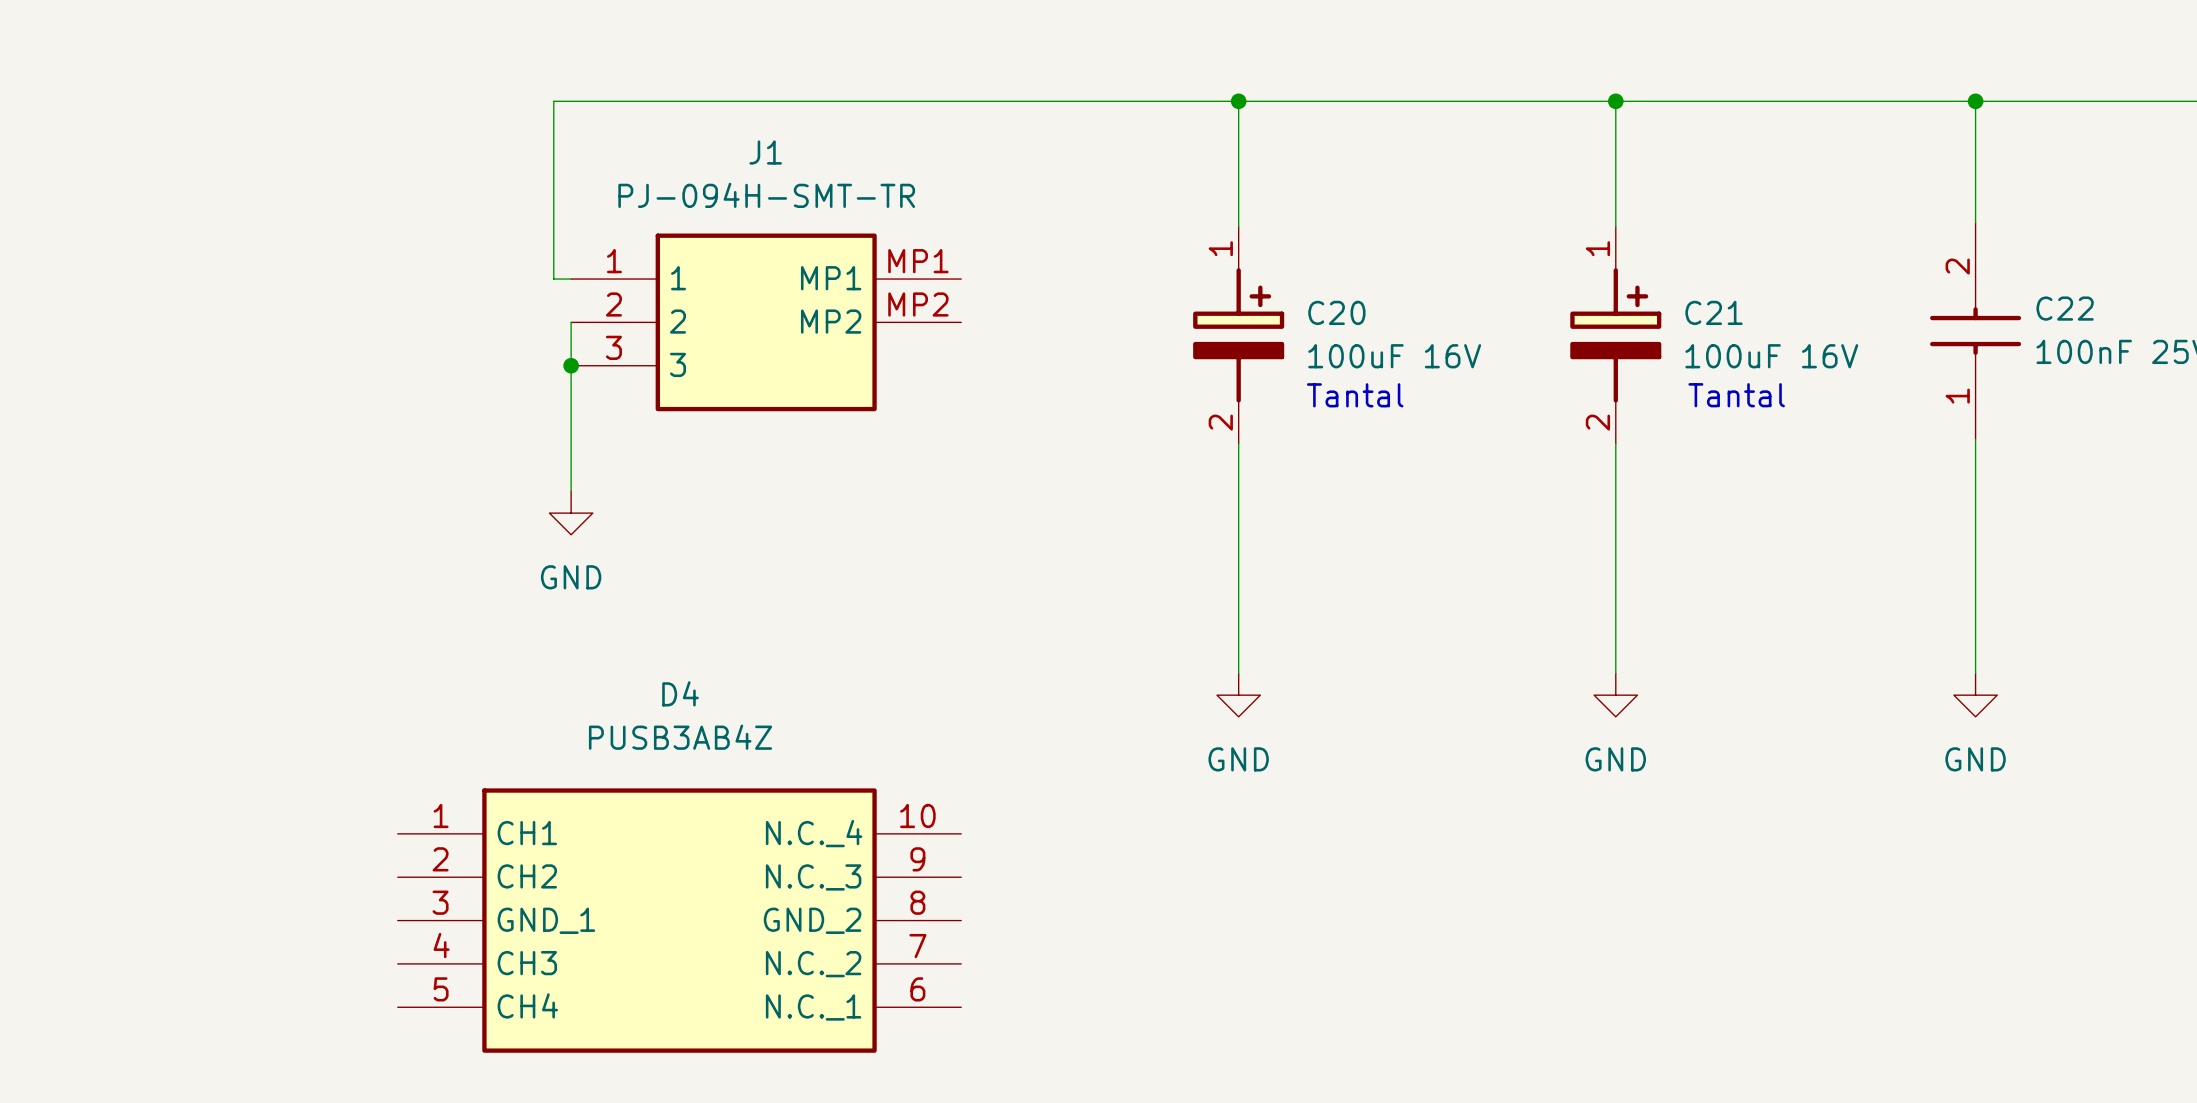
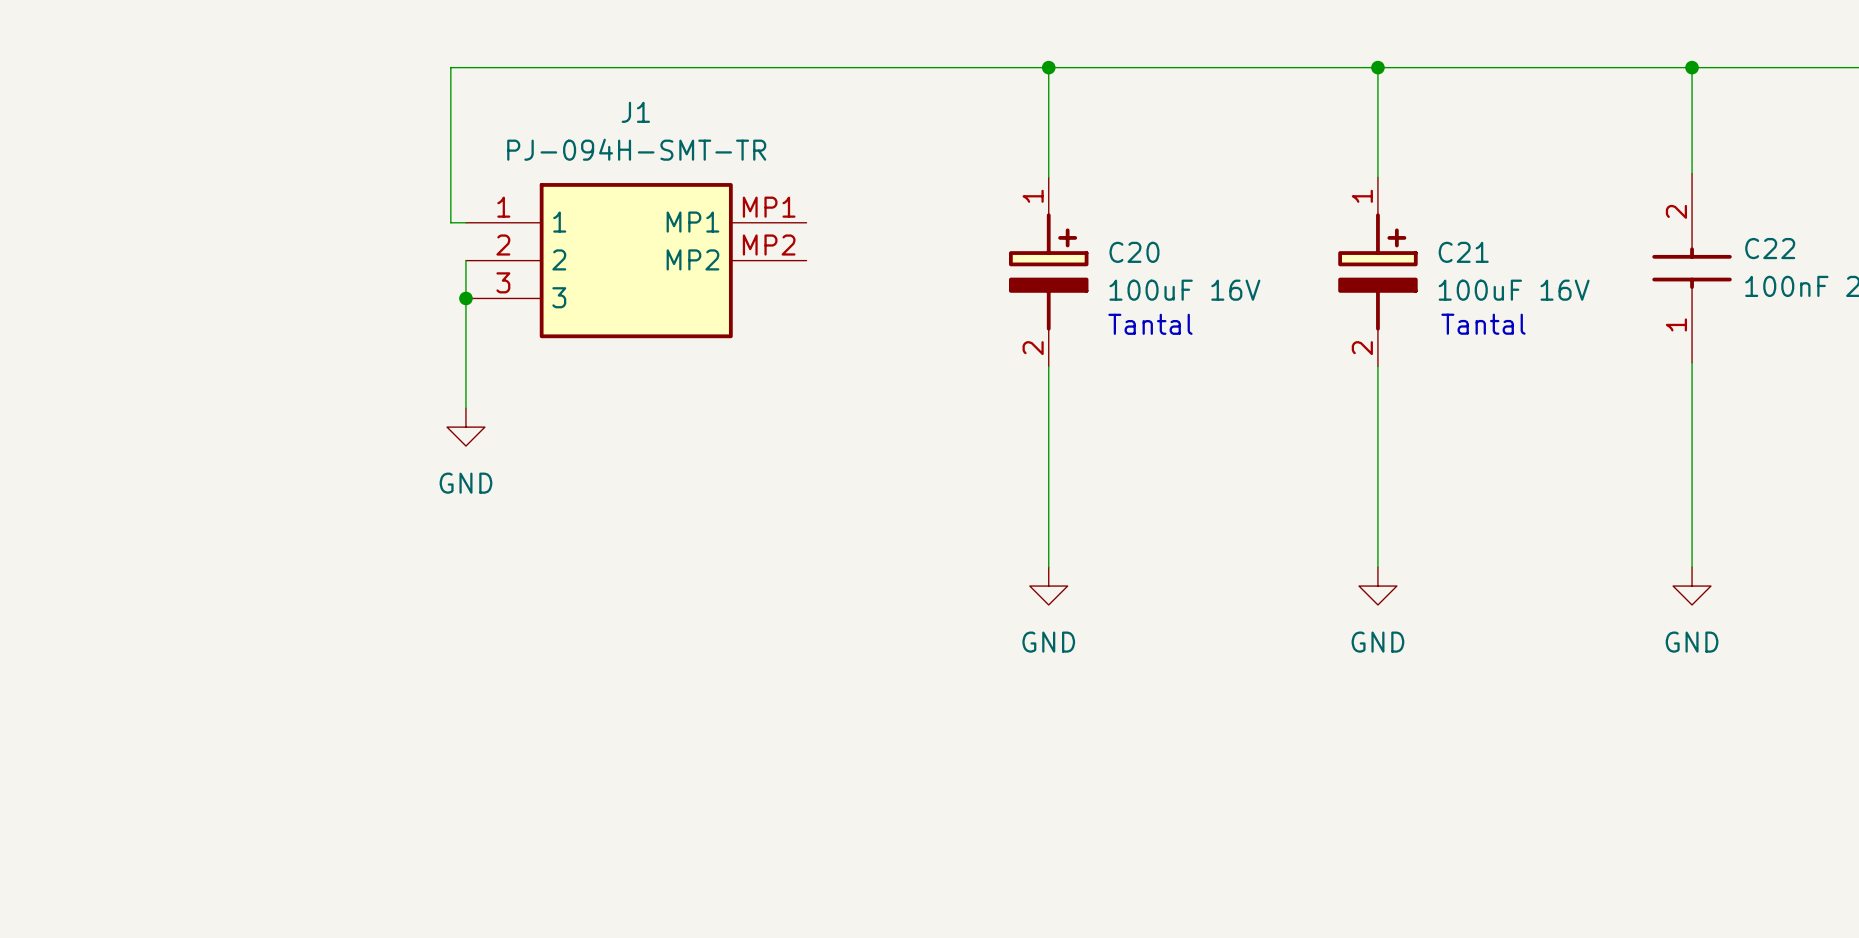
D4: PUSB3AB4Z (679, 920) -> none

